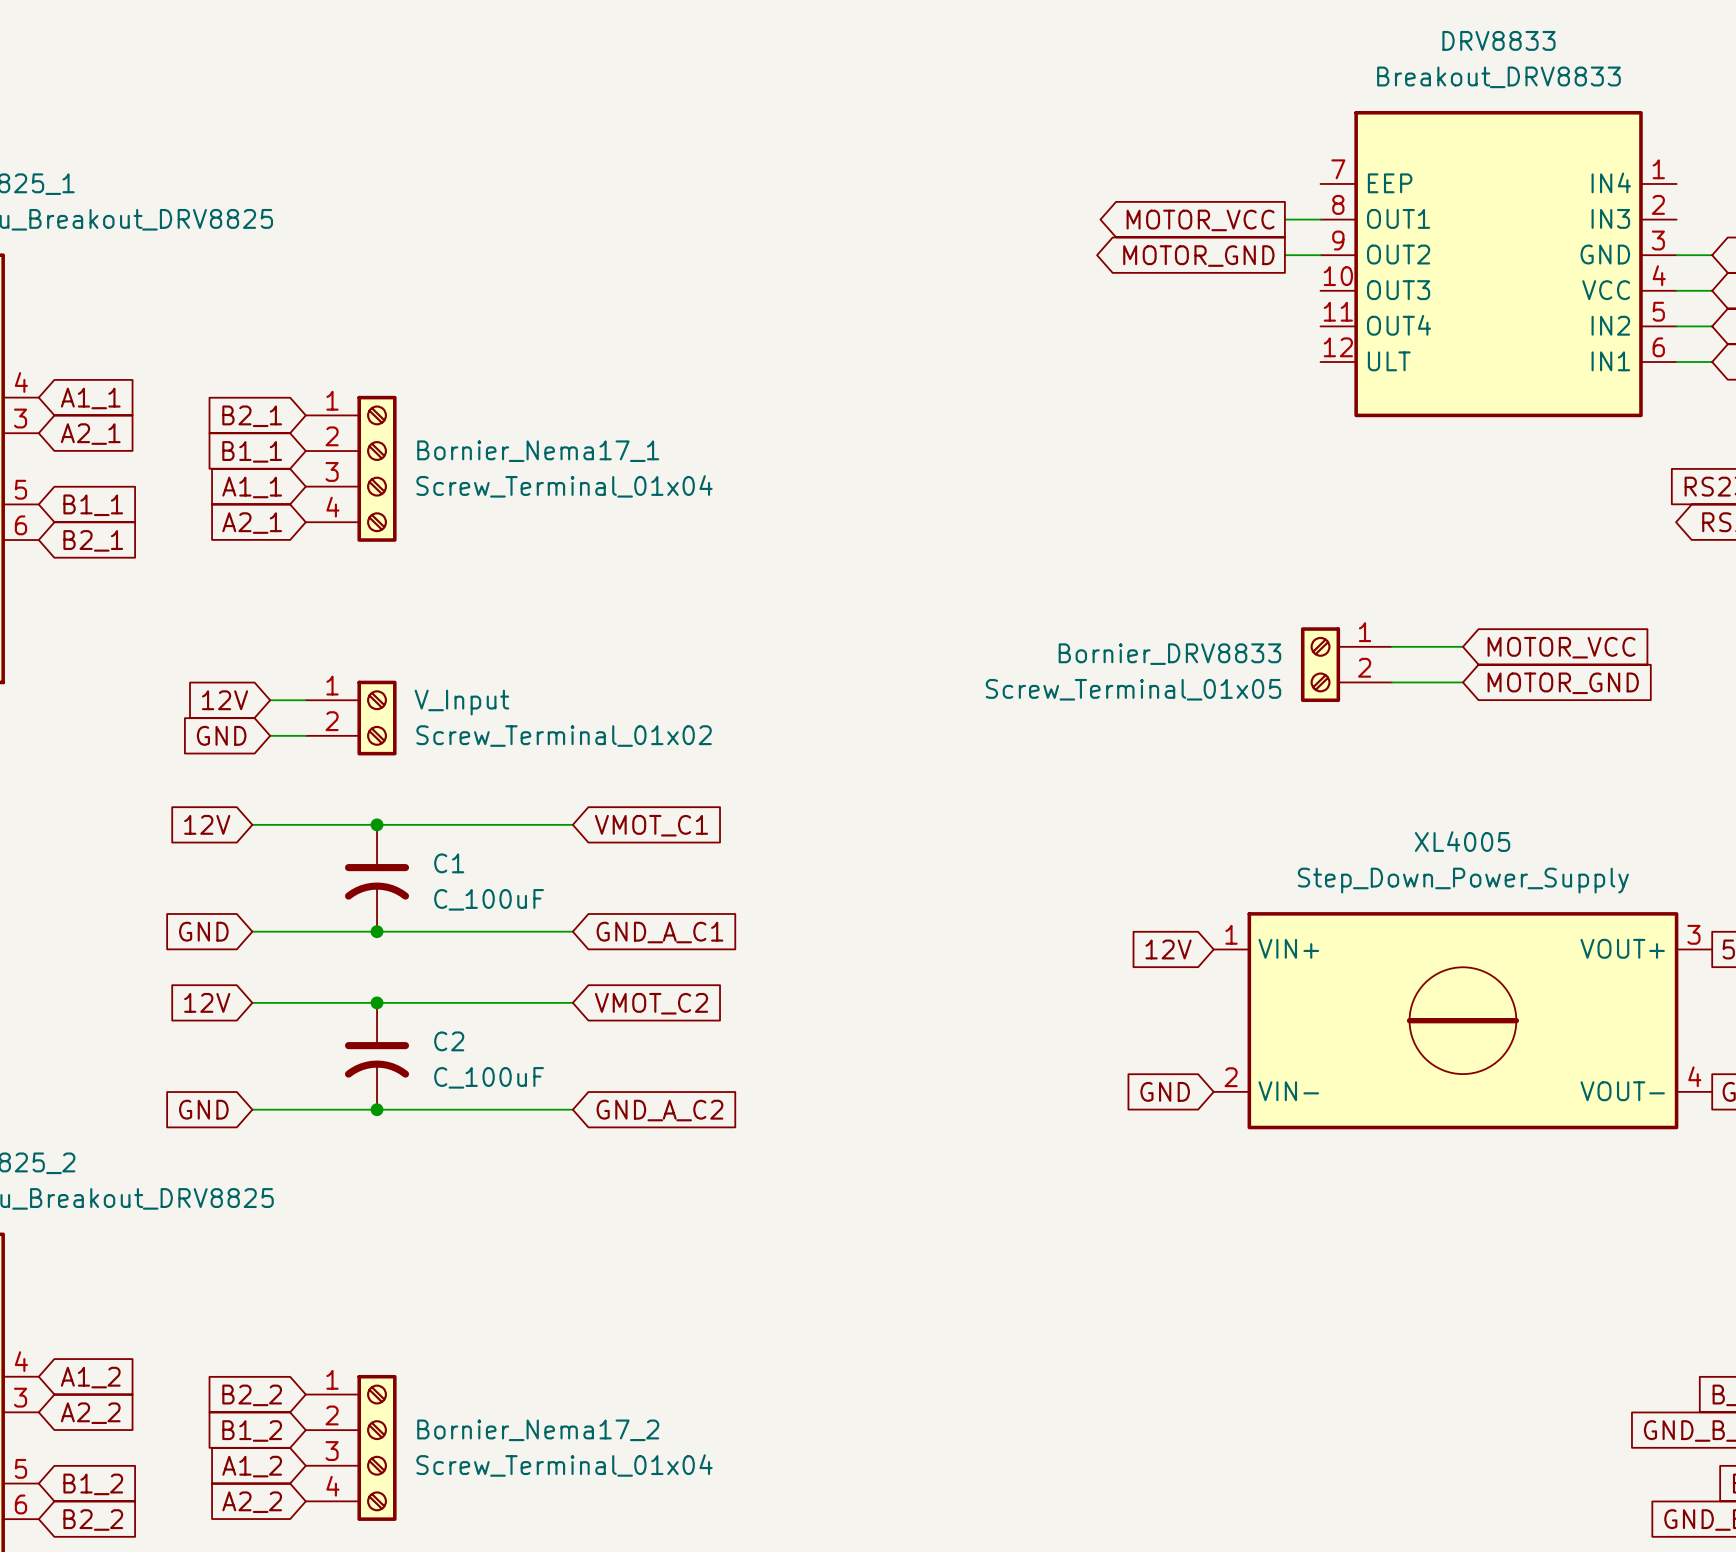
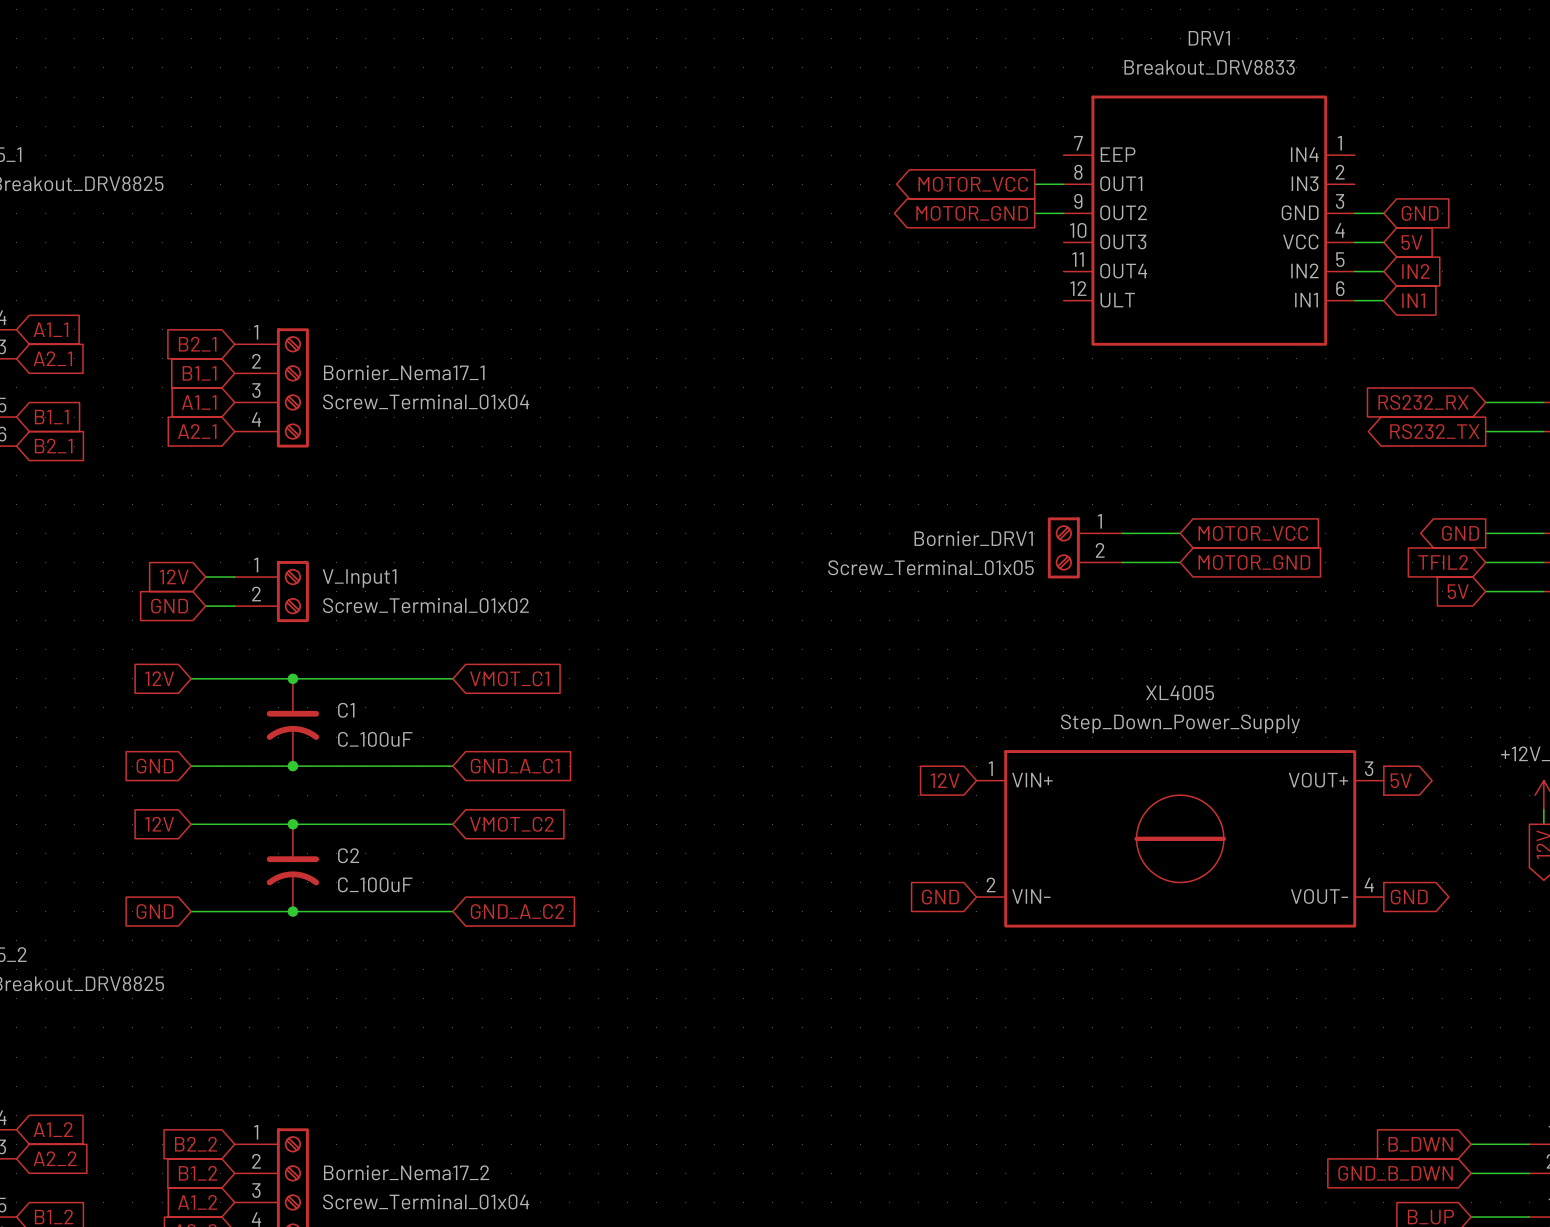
DRV8833 name: DRV8833 (1498, 40) -> DRV1 (1209, 38)
Bornier_DRV8833 name: Bornier_DRV8833 (1169, 654) -> Bornier_DRV1 (973, 538)
V_Input name: V_Input (461, 702) -> V_Input1 (359, 578)

